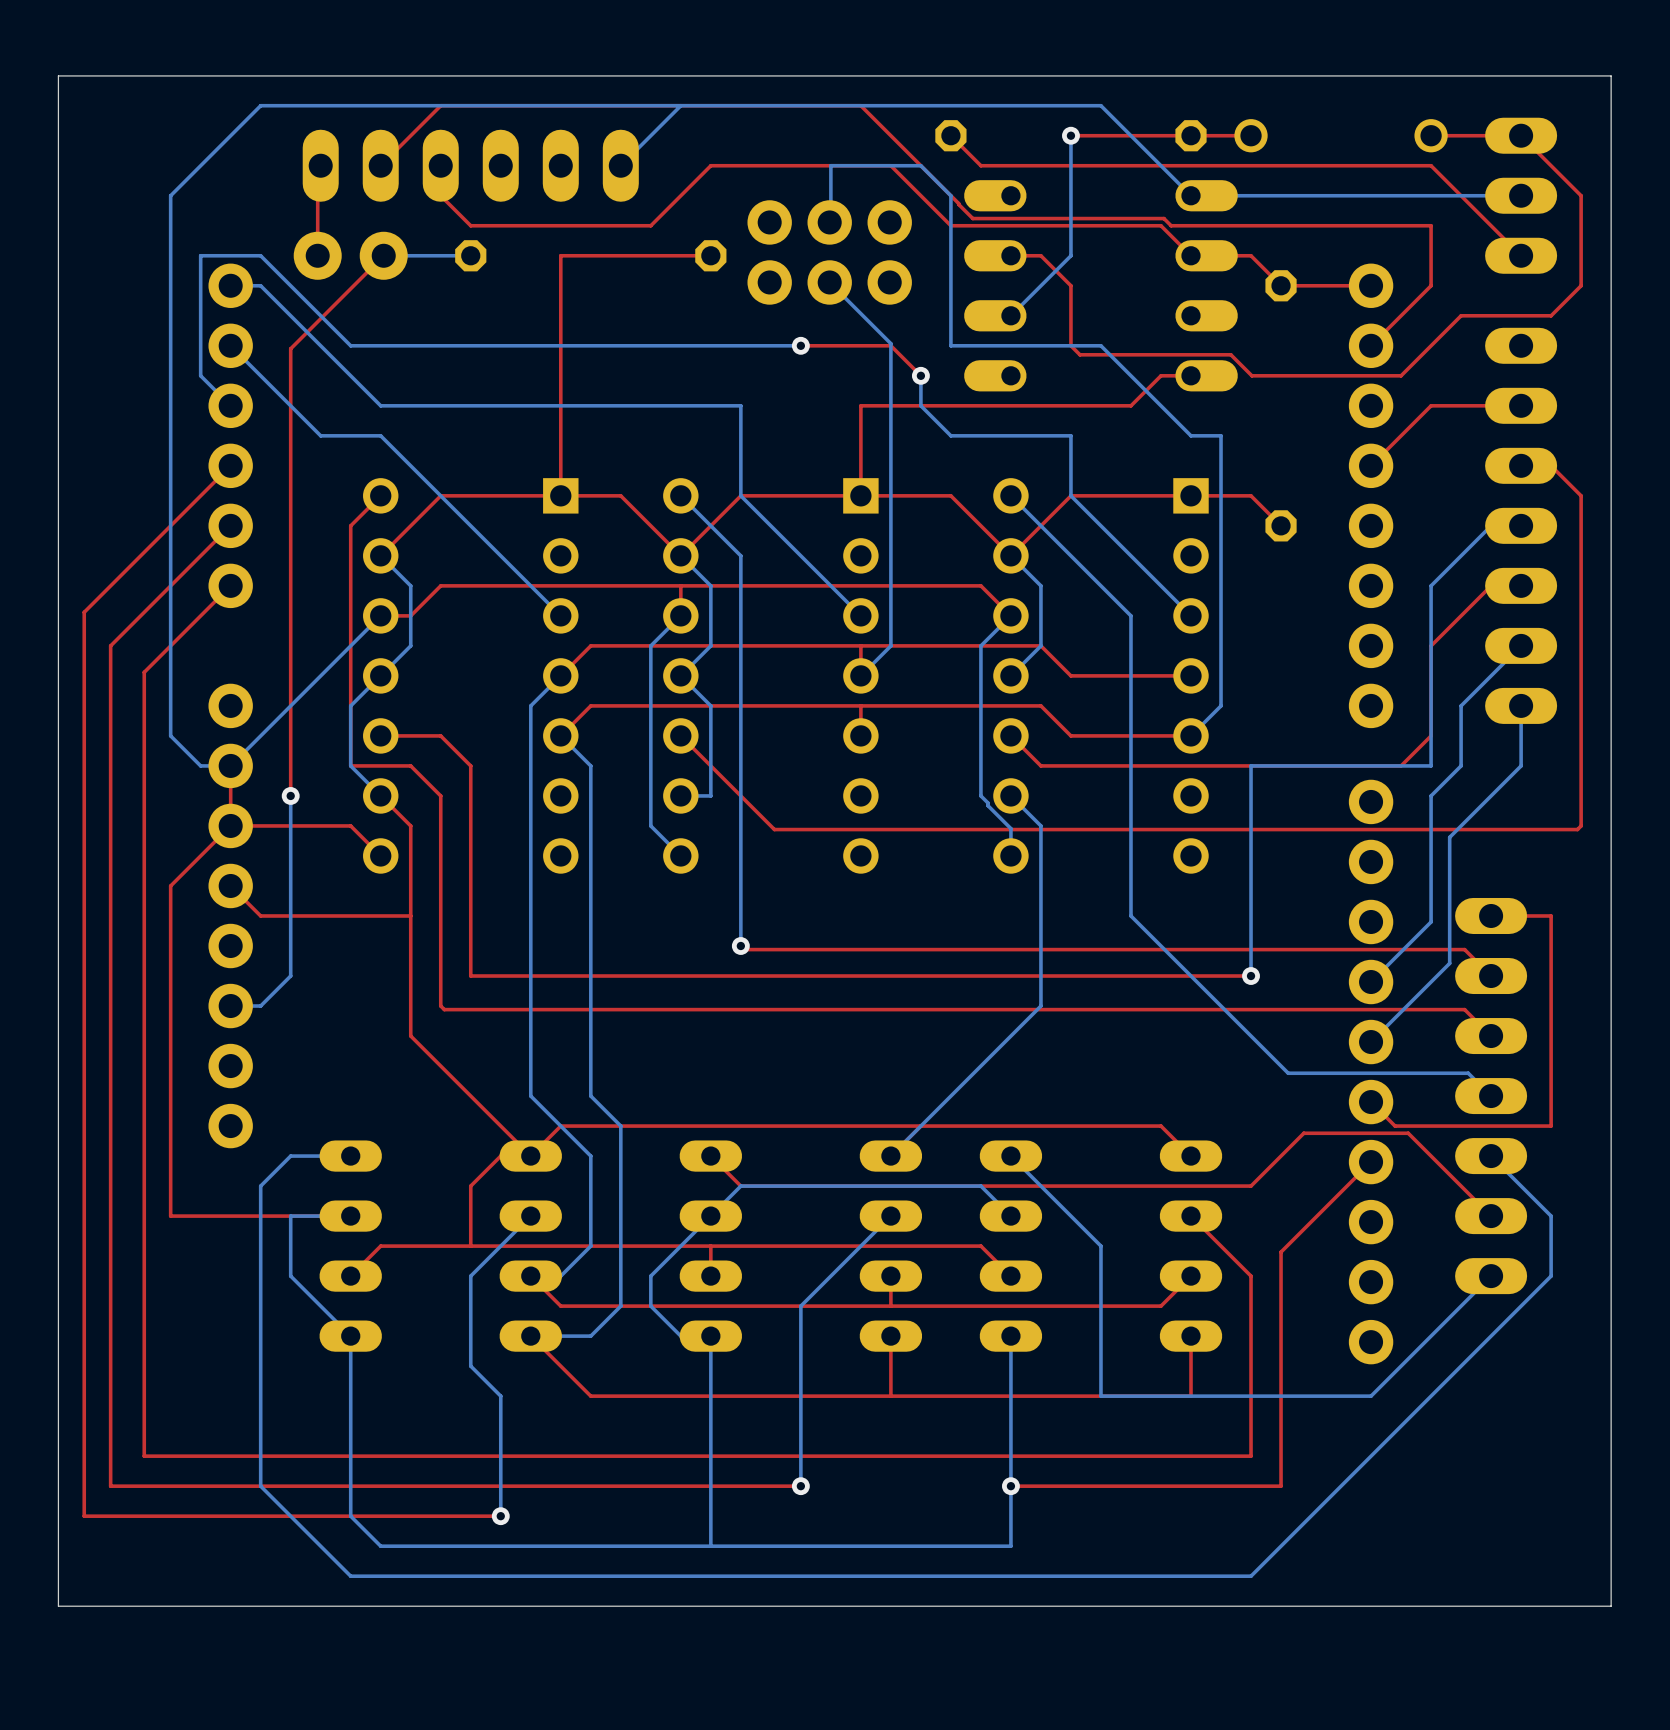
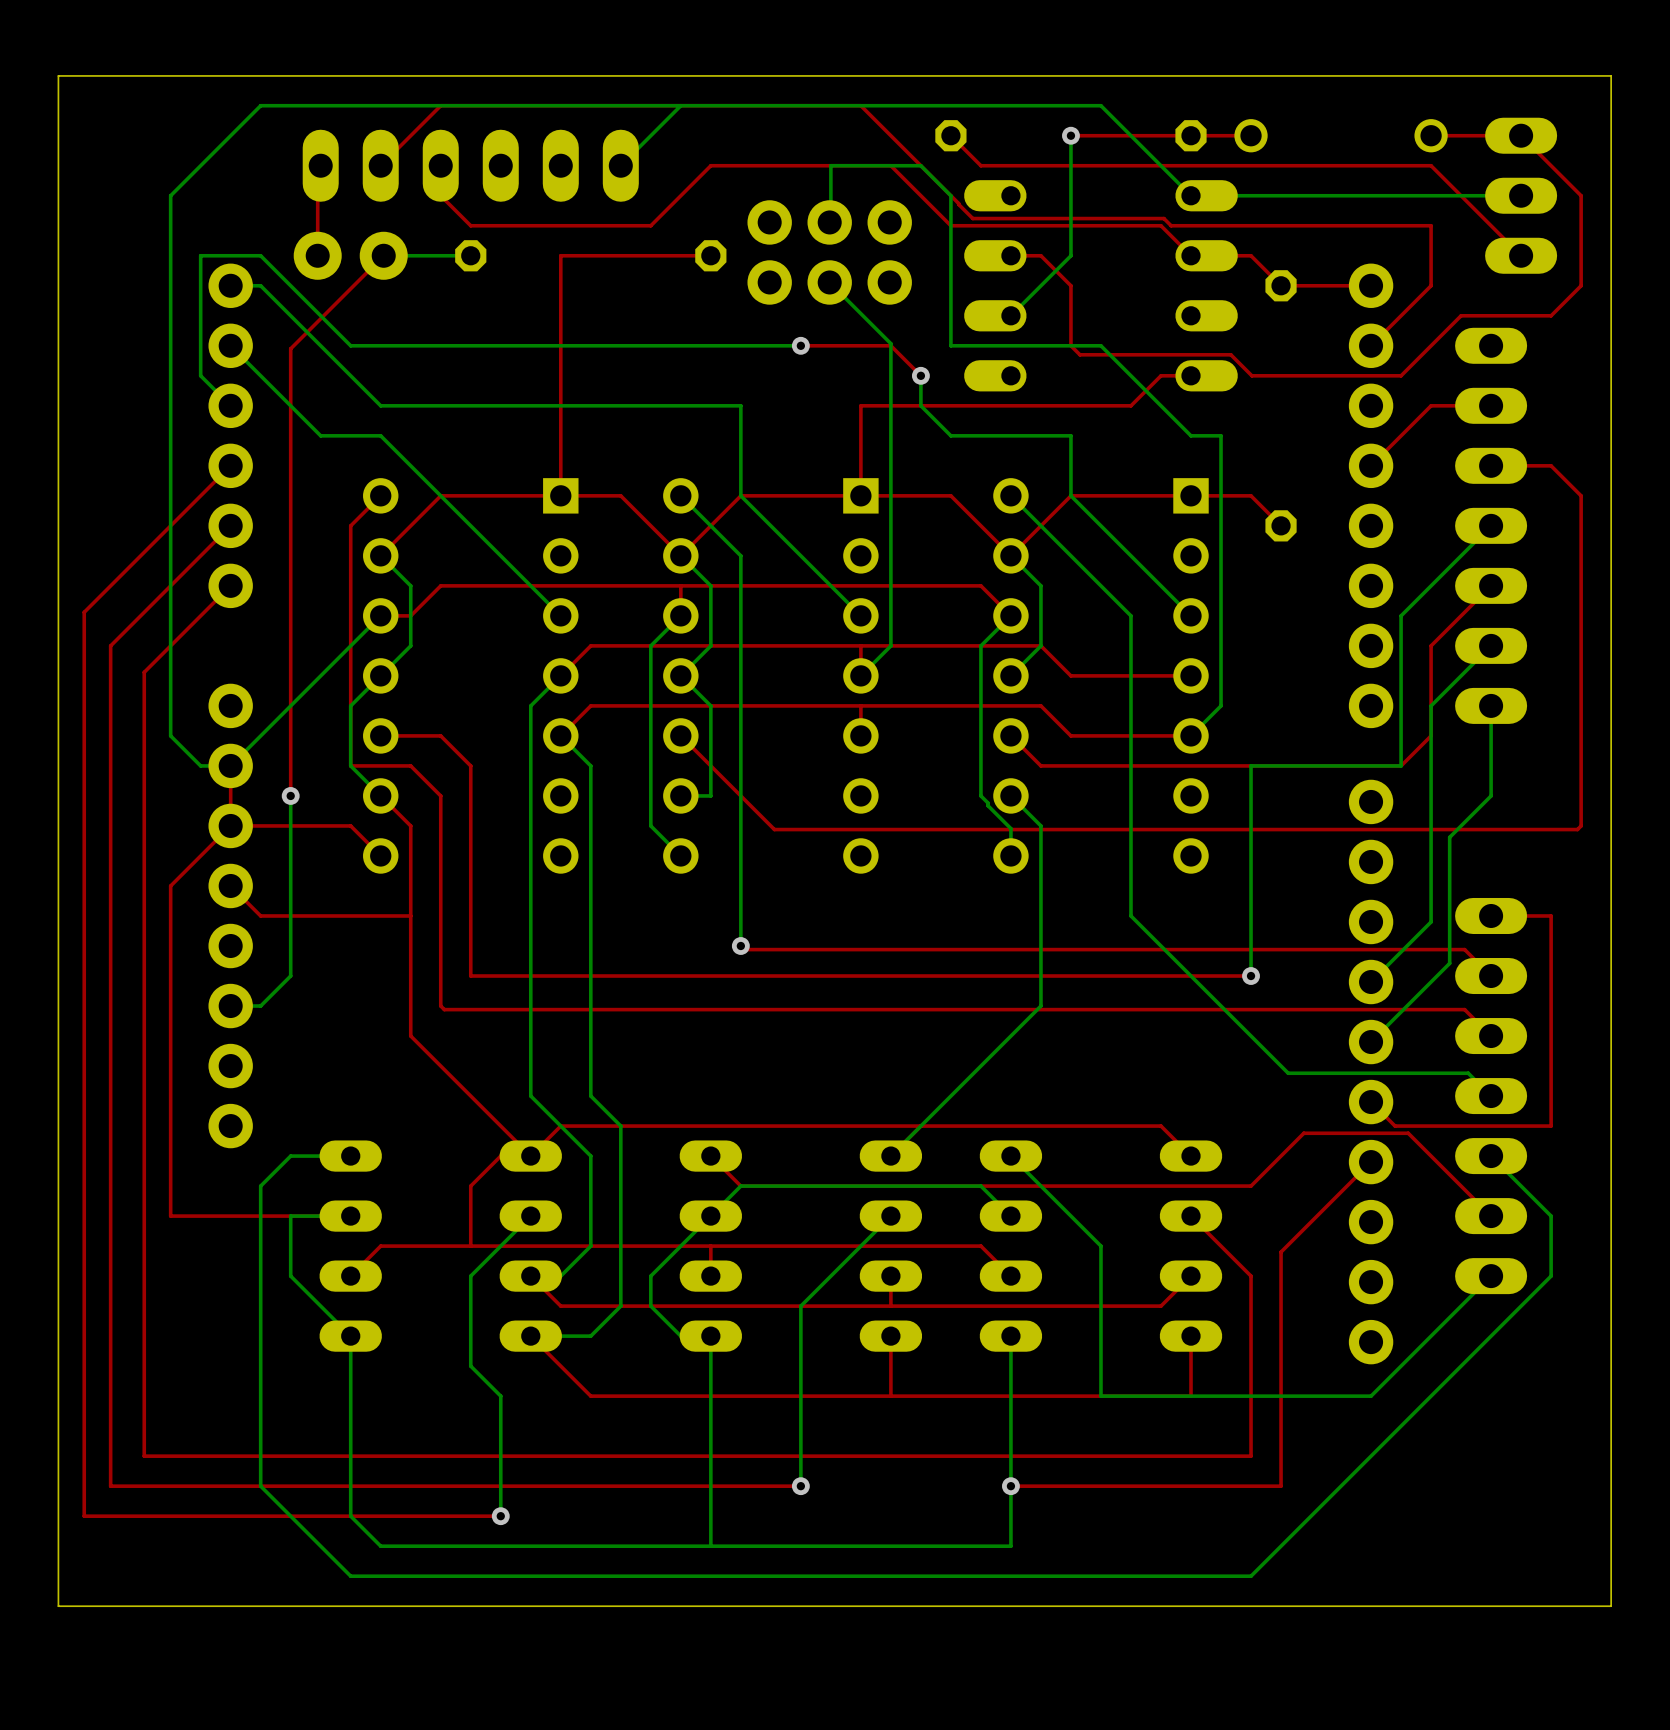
part position: (1521, 525) -> (1491, 525)
bottom track: (1431, 585) (1431, 705) -> (1431, 585) (1401, 615) (1401, 765)
bottom track: none -> (1491, 645) (1431, 705)
bottom track: (1521, 645) (1461, 705) (1461, 765) (1431, 795) -> none
bottom track: (1521, 705) (1521, 765) (1491, 795) -> (1491, 705) (1491, 795)
bottom track: (1431, 765) (1401, 765) -> (1431, 765) (1431, 795)

